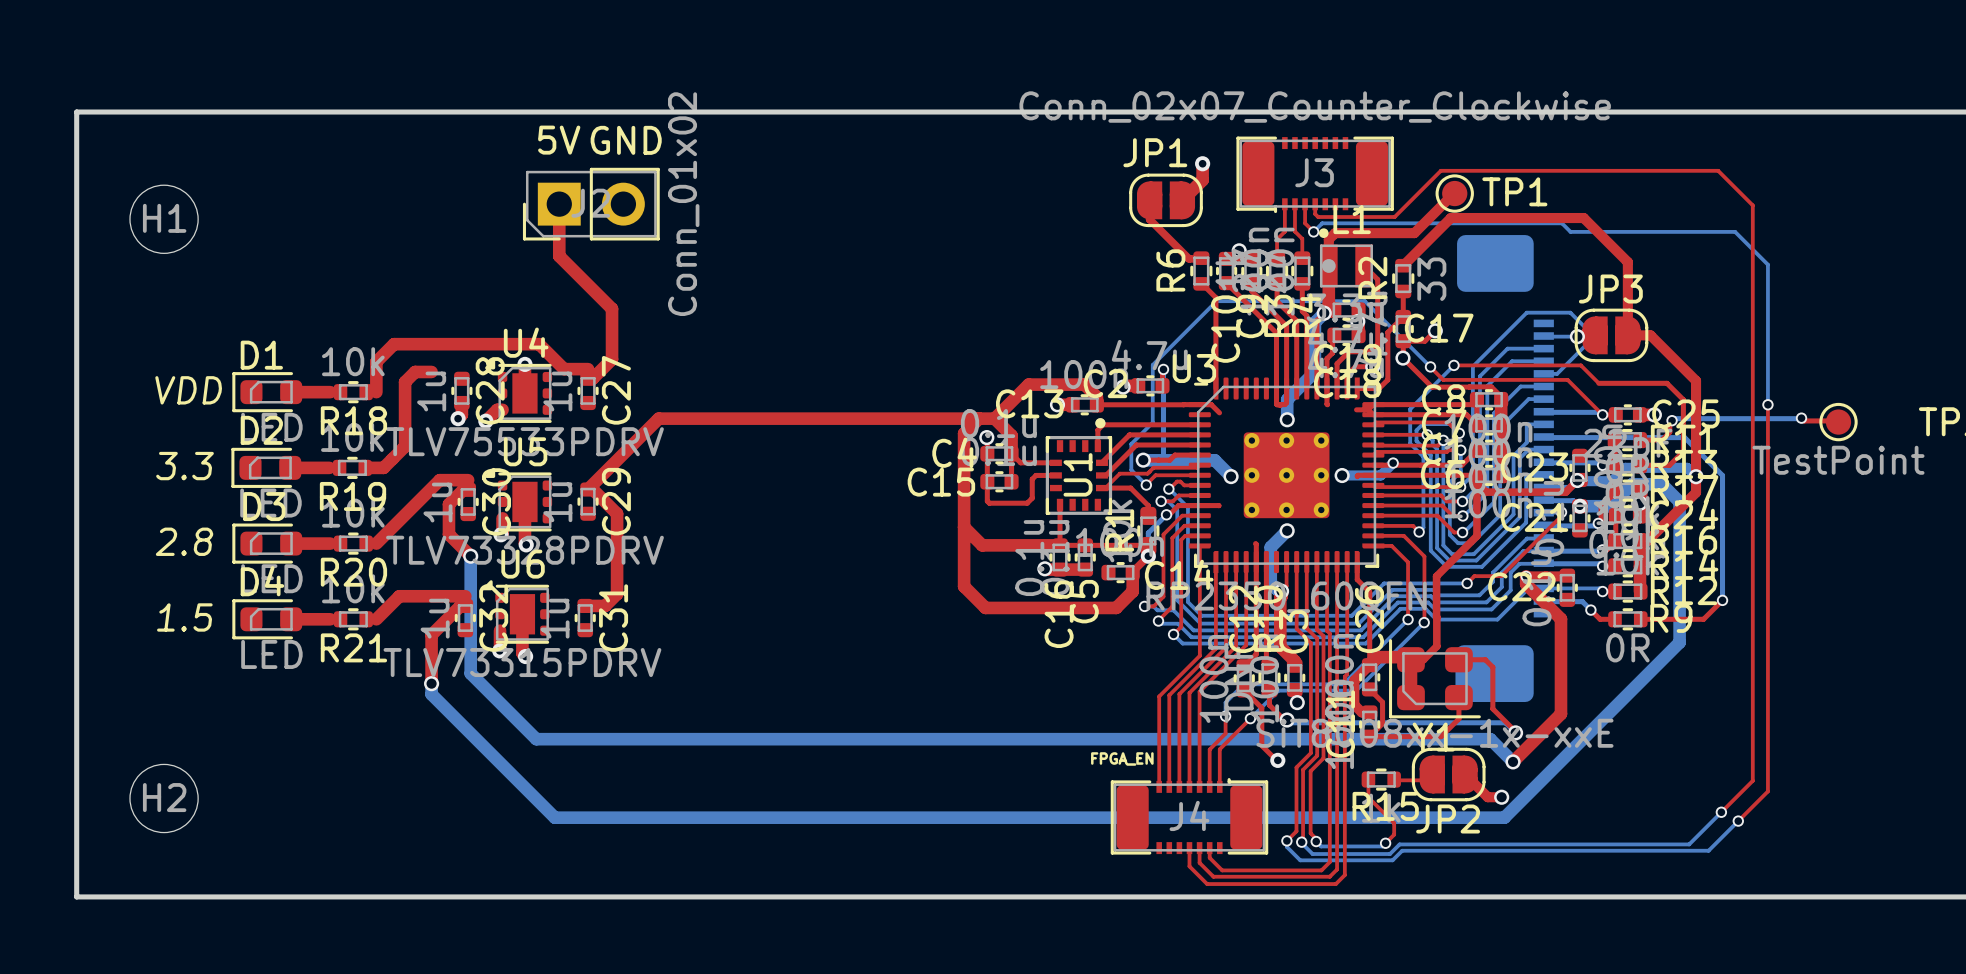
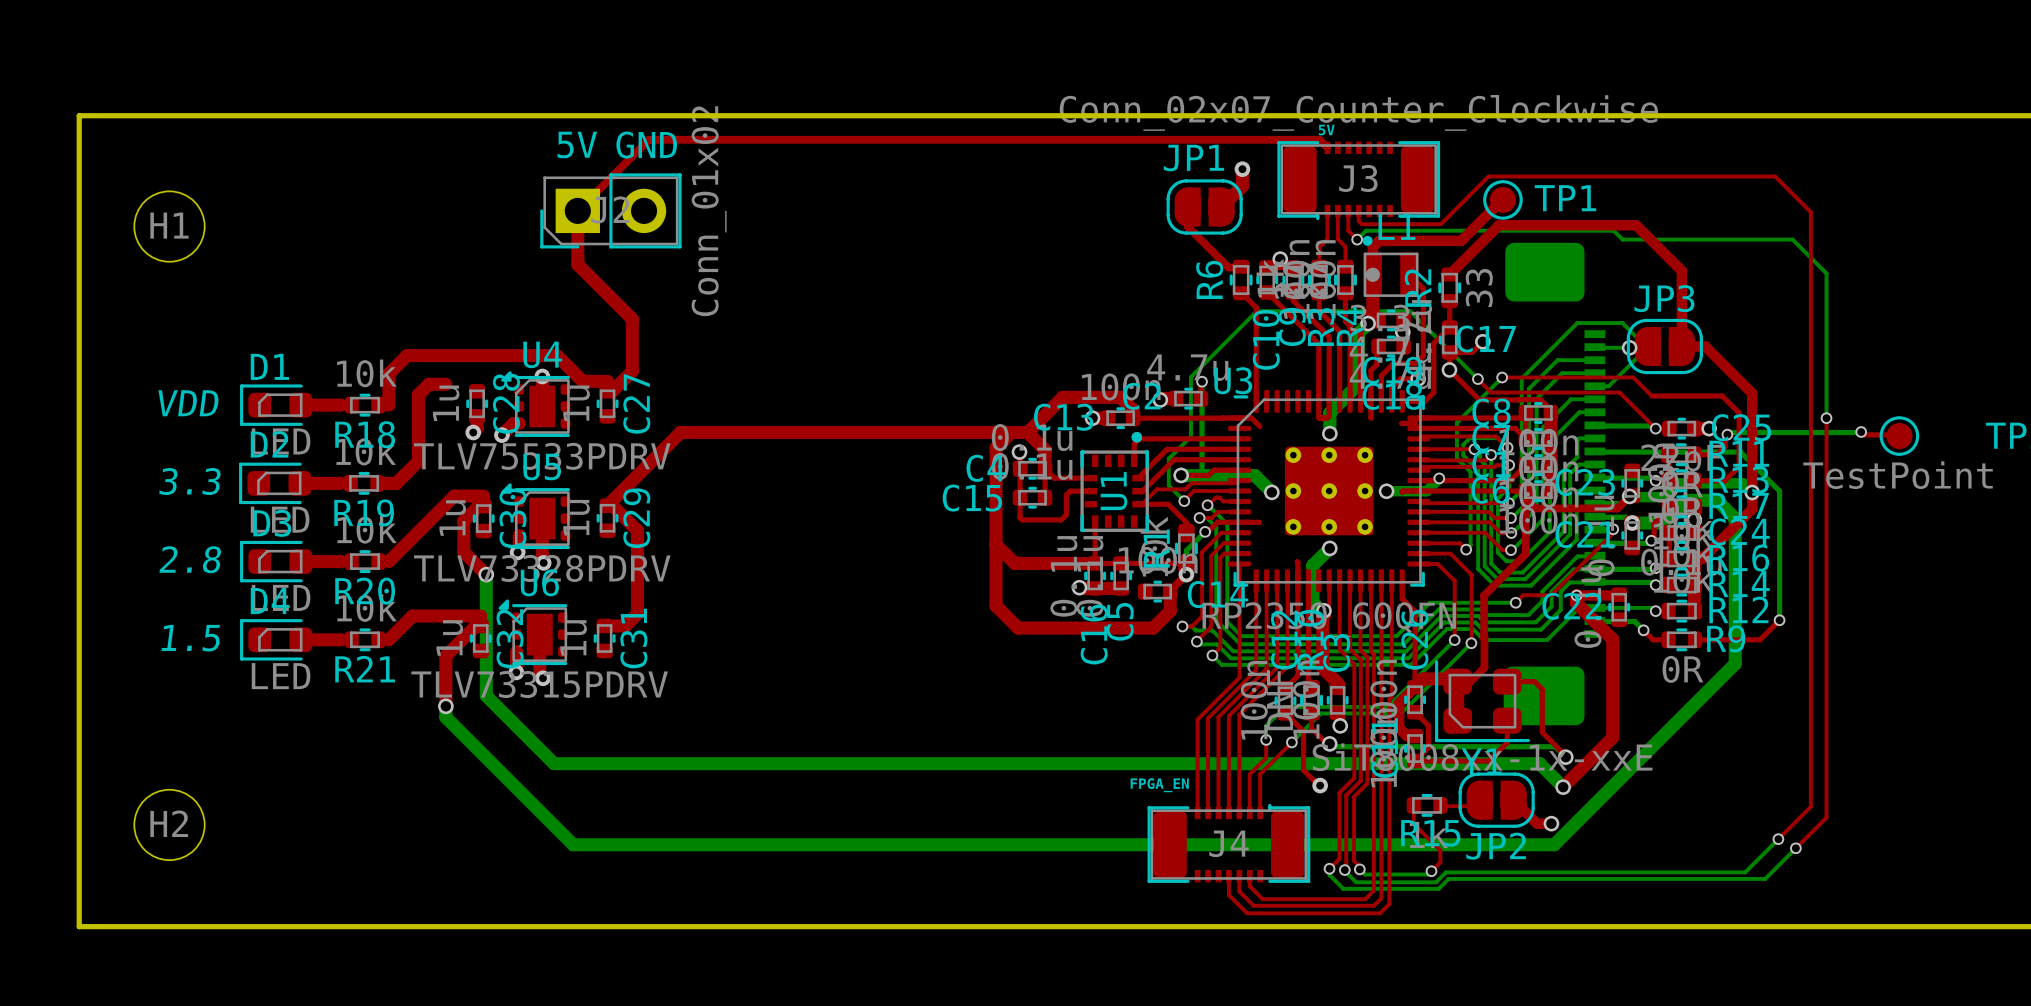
text: none -> 5V (1326, 130)
top track: none -> (1327, 147) (1319, 139) (648, 139) (577, 210)

